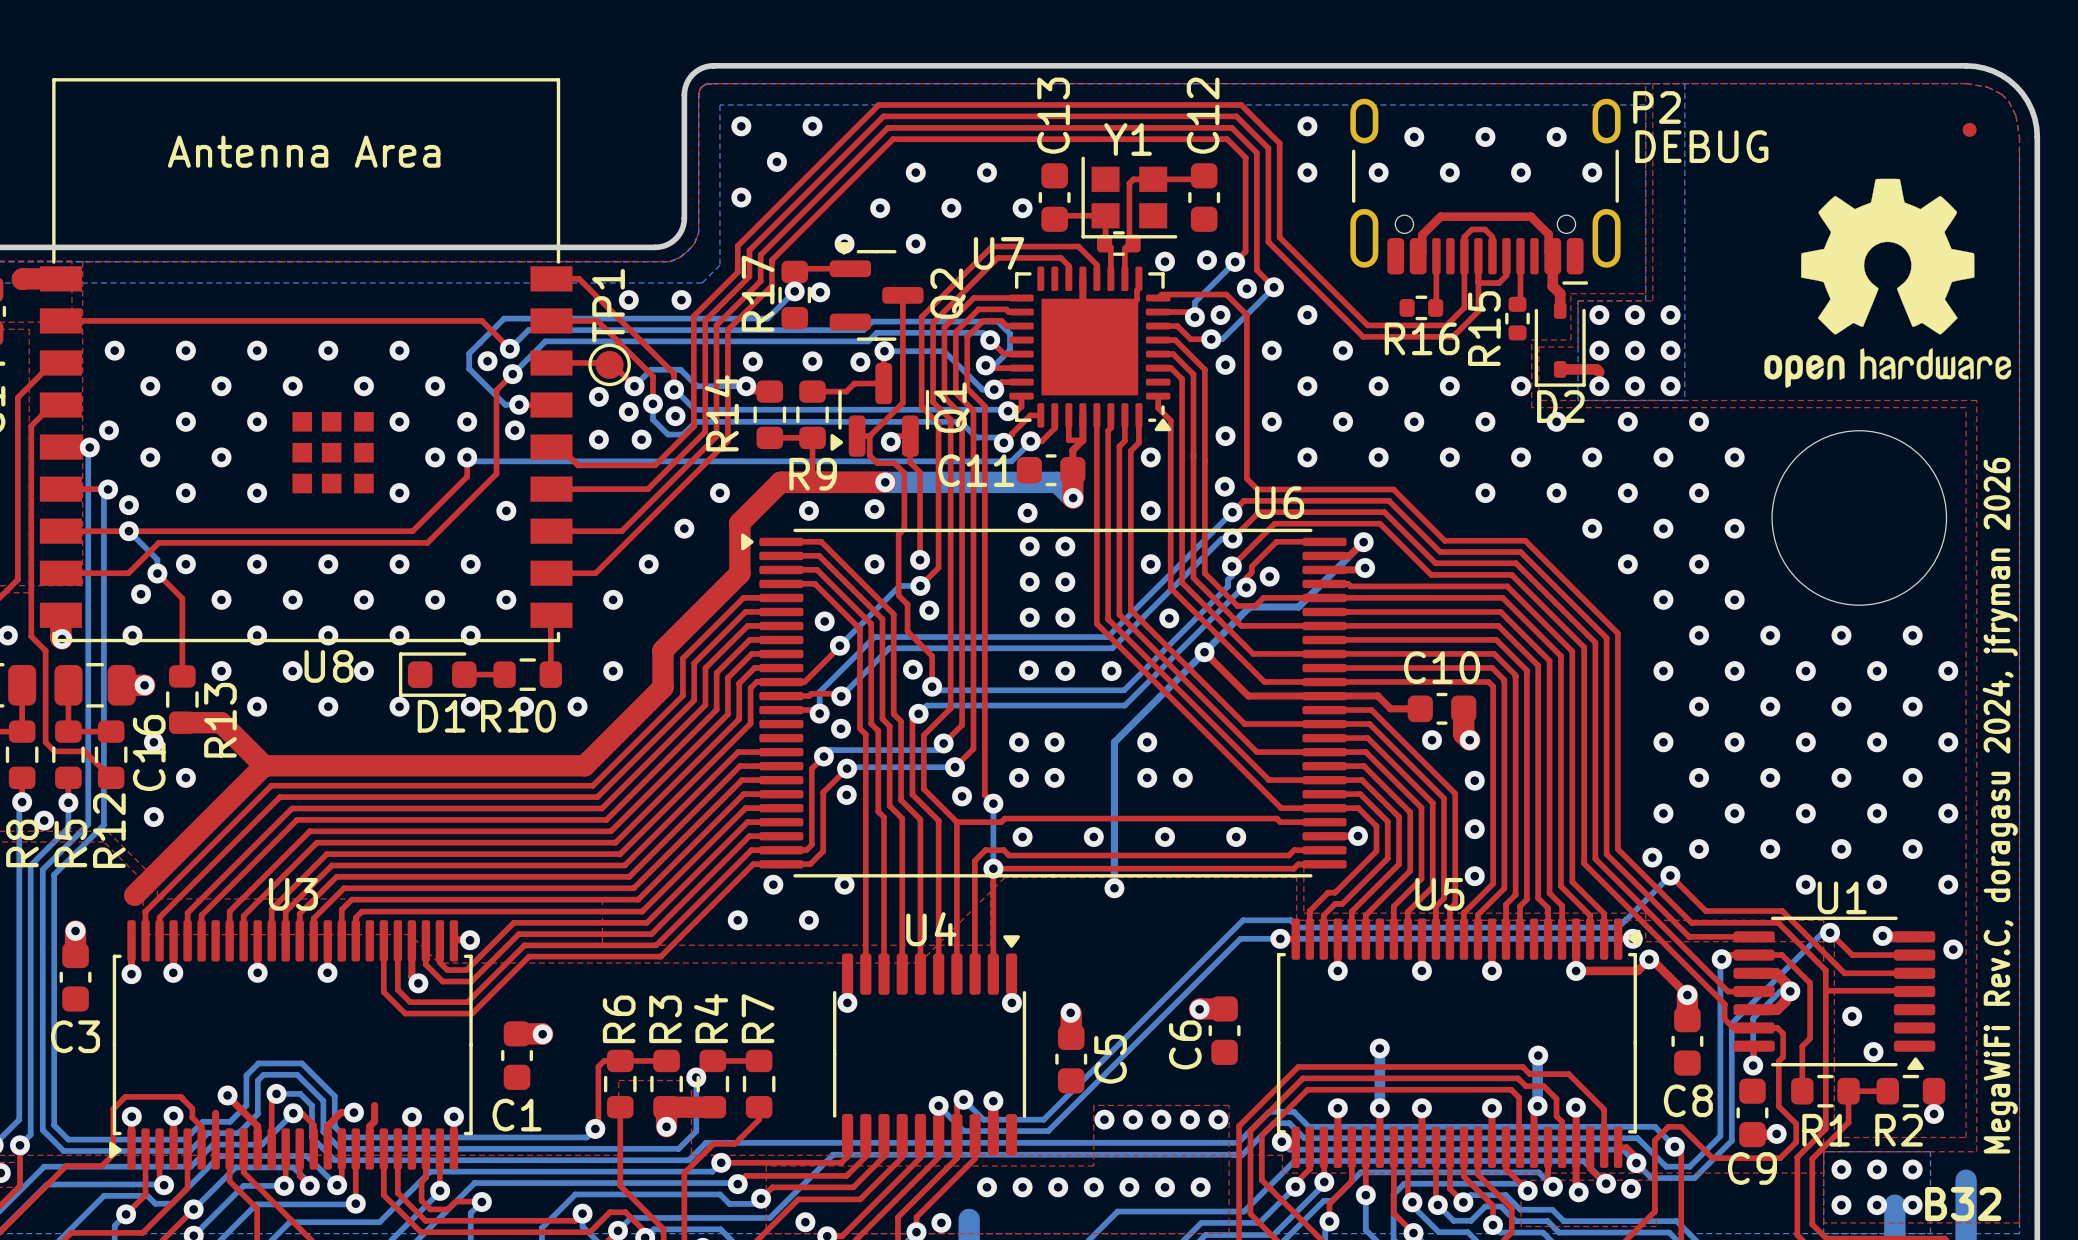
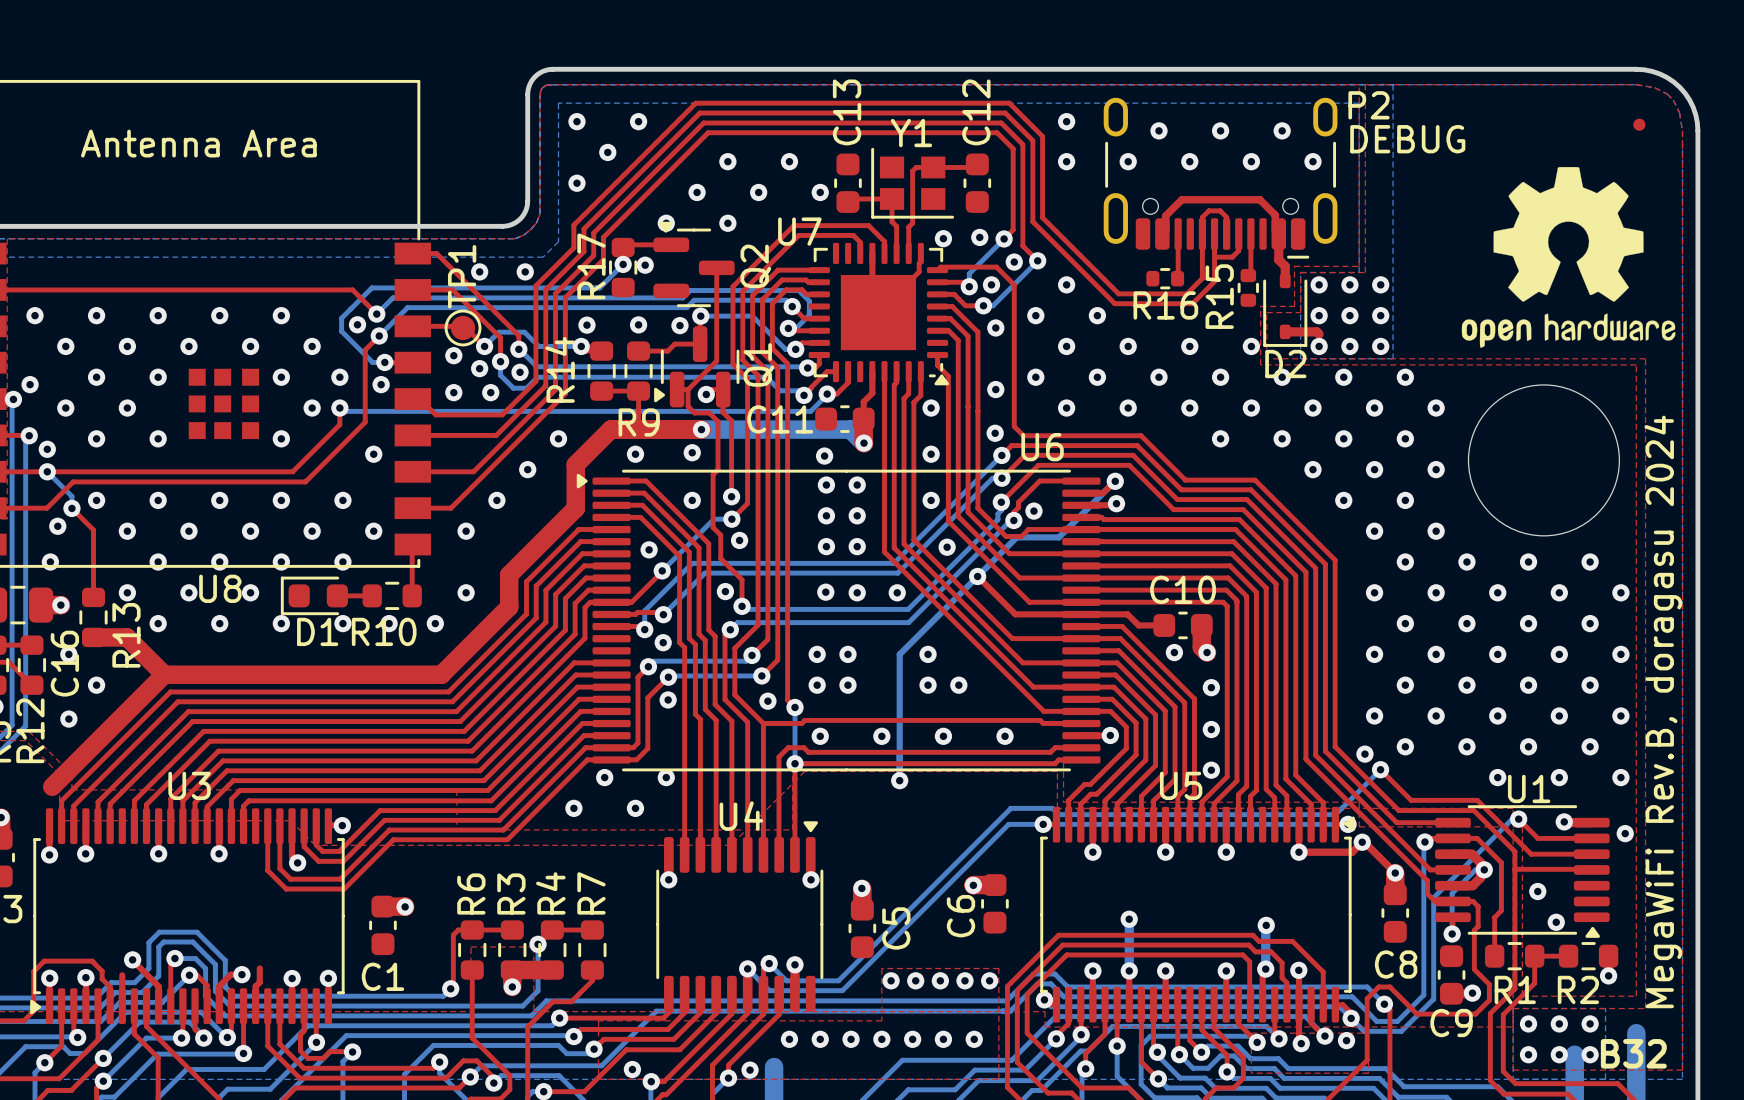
part: (1118, 243) -> none
U7 footprint: [1009, 266, 1172, 432] -> [808, 242, 949, 386]
top track: (1068, 415) (1068, 440) (1082, 440) -> none
text: MegaWiFi Rev.C, doragasu 2024, jfryman 2026 (2000, 805) -> MegaWiFi Rev.B, doragasu 2024 (1663, 711)

